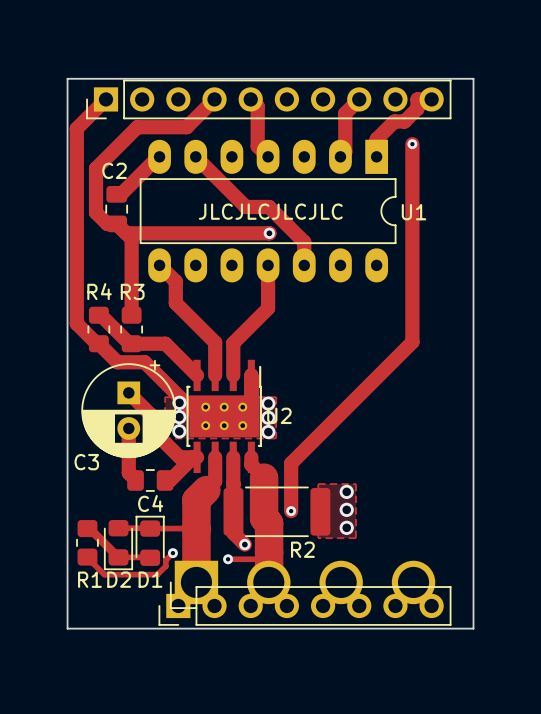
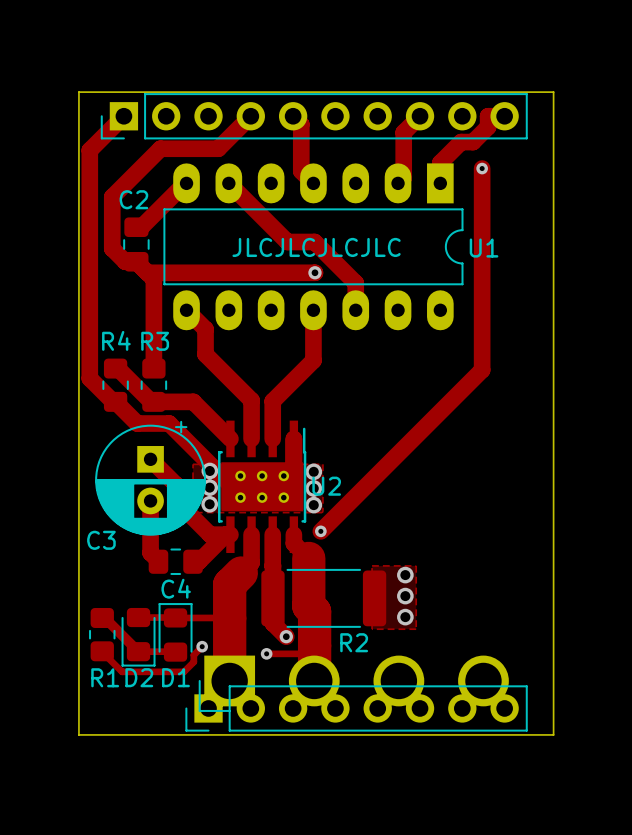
track: (412, 316) (412, 342) (291, 463) (291, 511) -> (482, 370) (320, 531)
via position: (291, 511) -> (320, 531)

